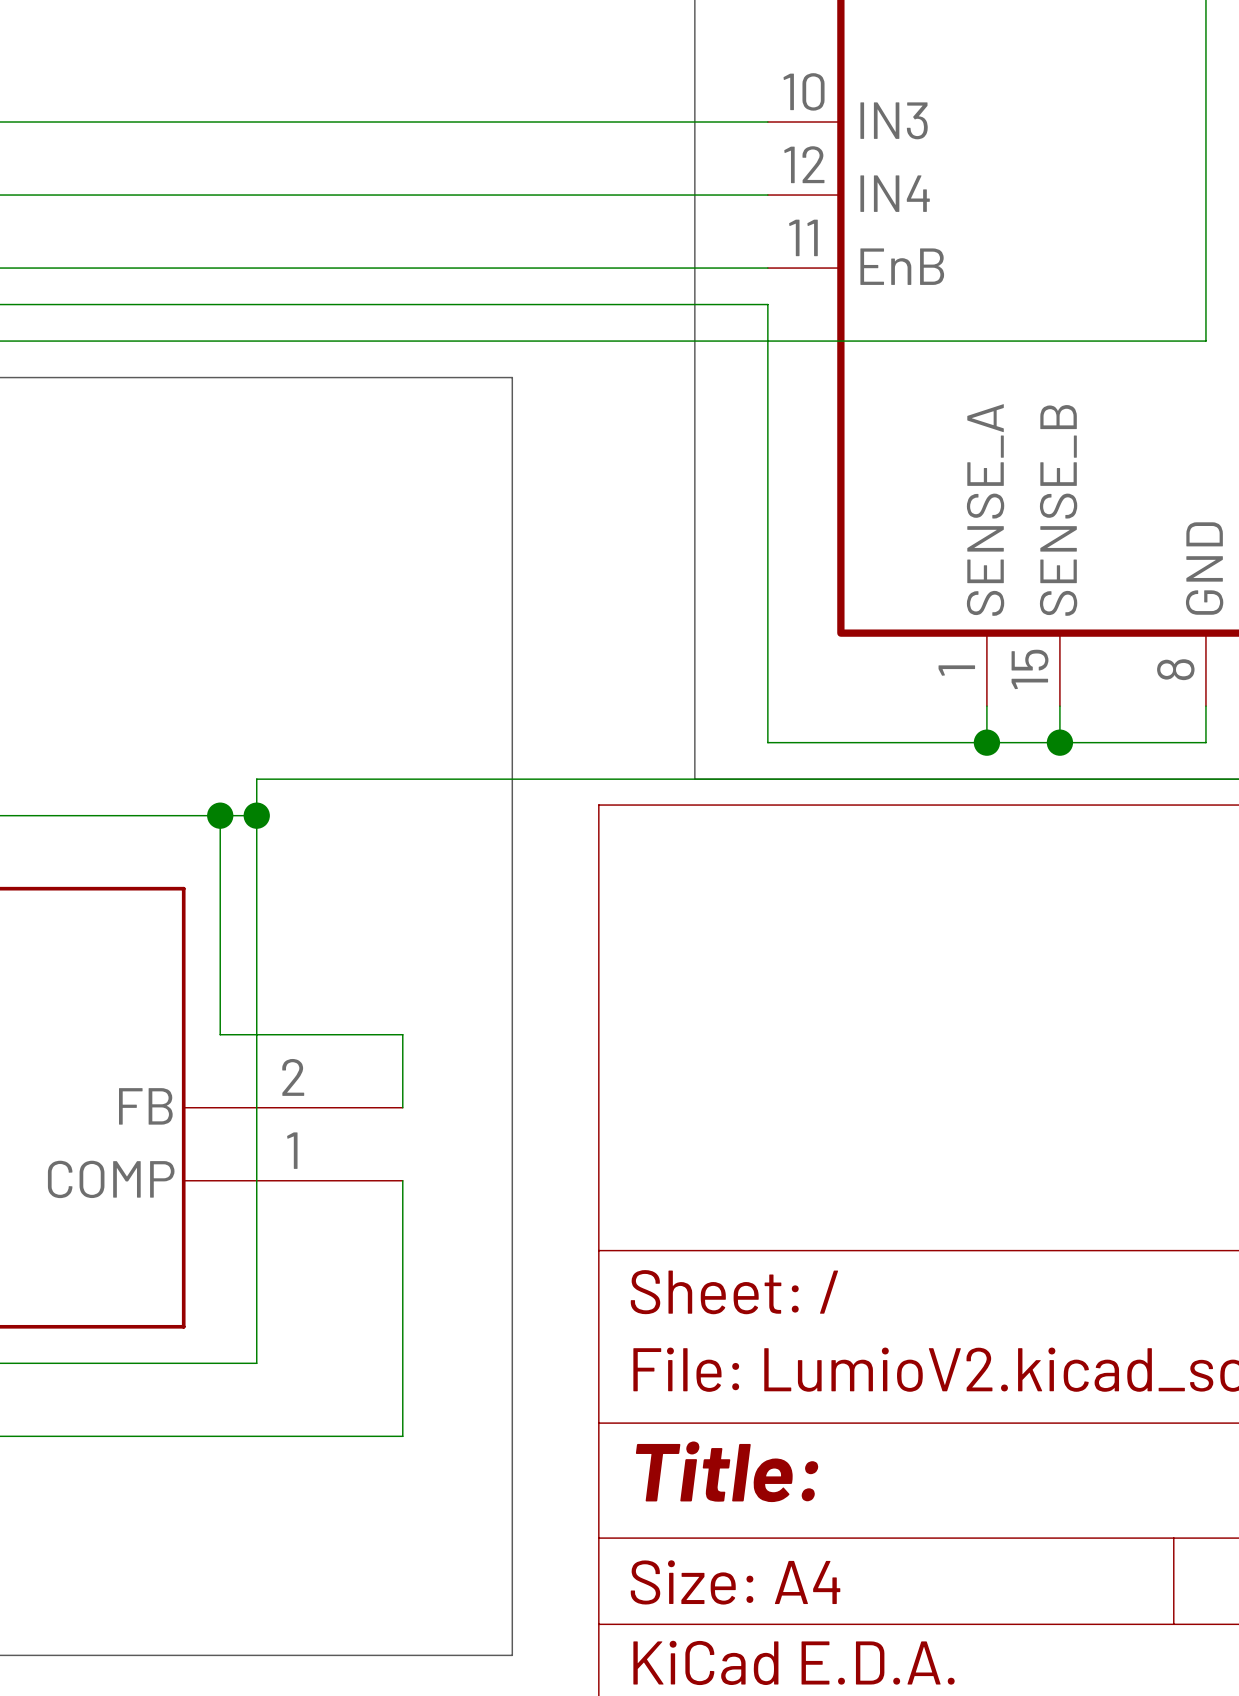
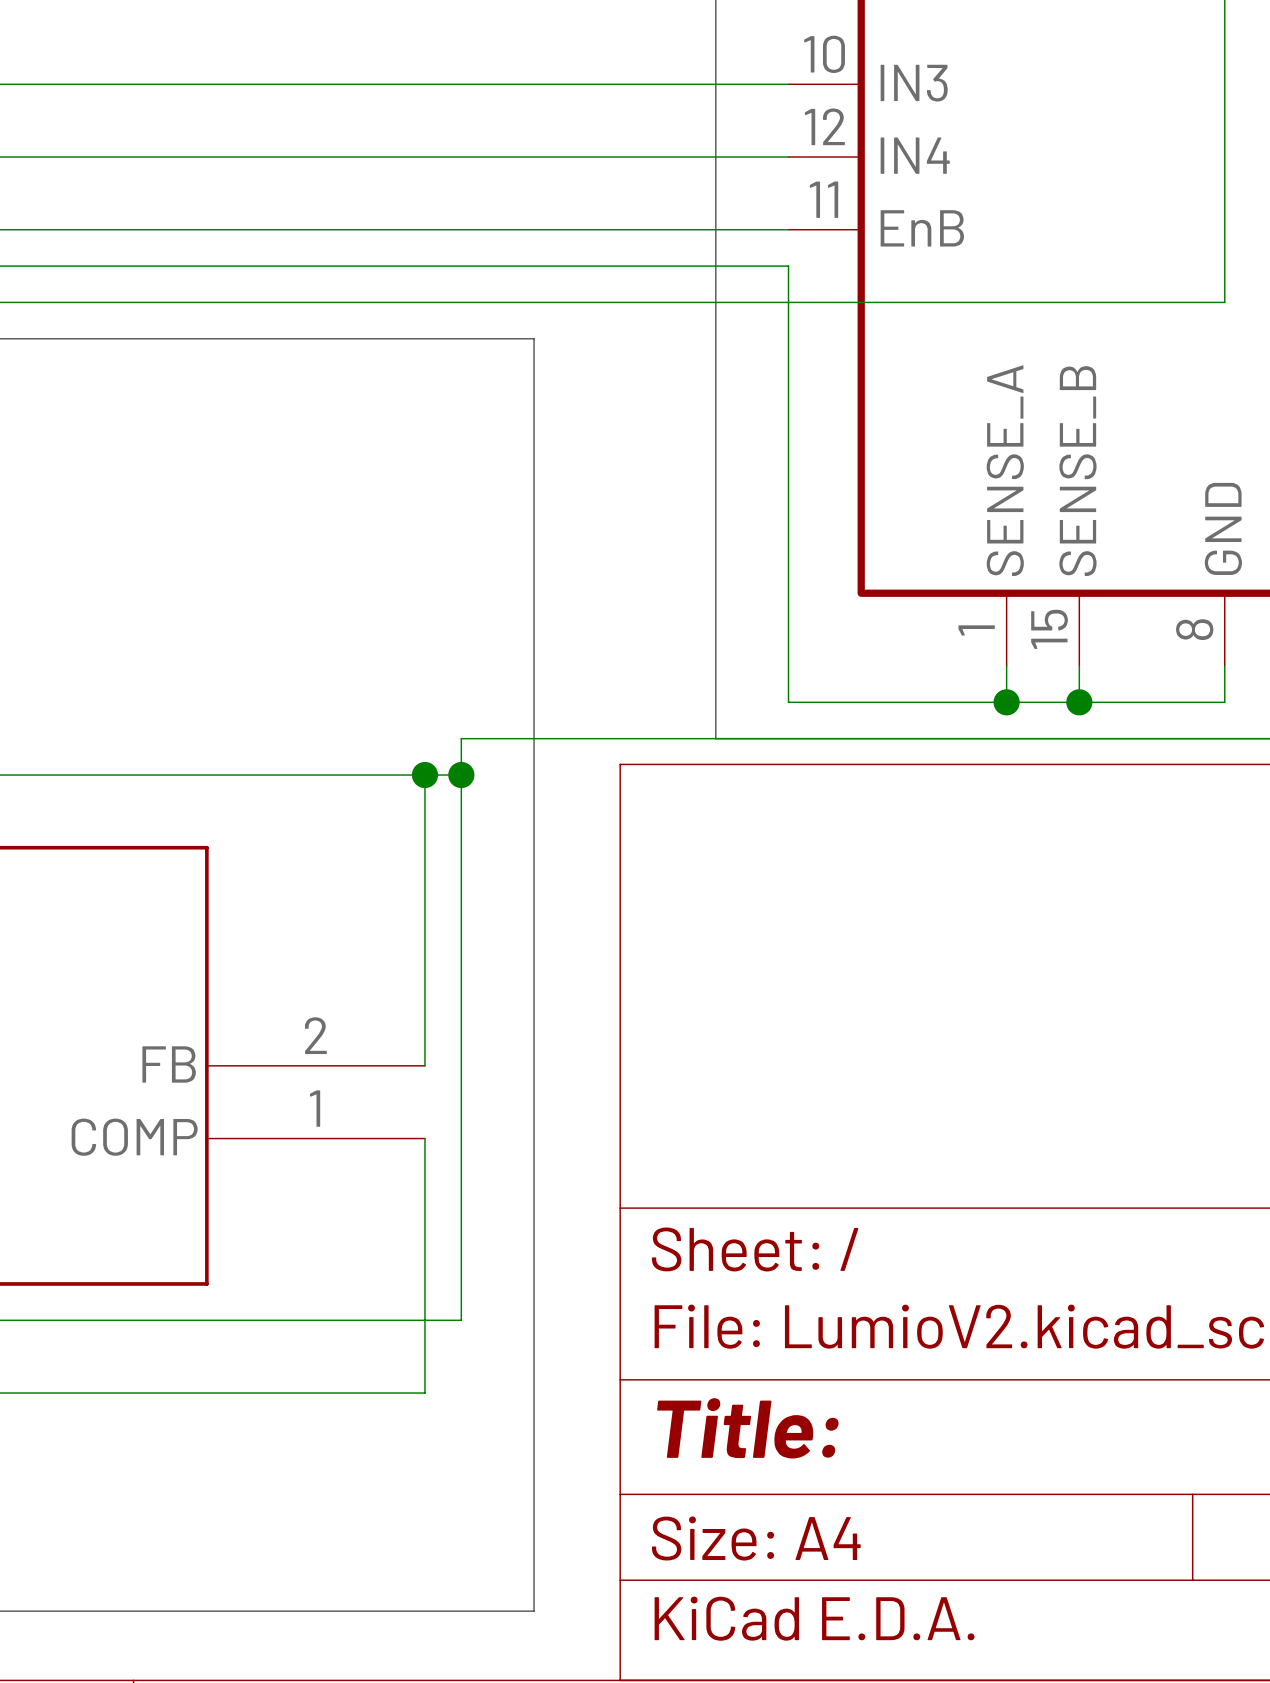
wire: (439, 779) (256, 779) (256, 1363) -> (461, 738) (461, 1320) (279, 1320)
wire: (220, 815) (220, 1034) (402, 1034) -> (424, 775) (424, 993)
junction: (220, 815) -> none
wire: none -> (279, 775) (461, 775)
junction: (256, 815) -> none
junction: none -> (424, 775)
junction: none -> (461, 775)

